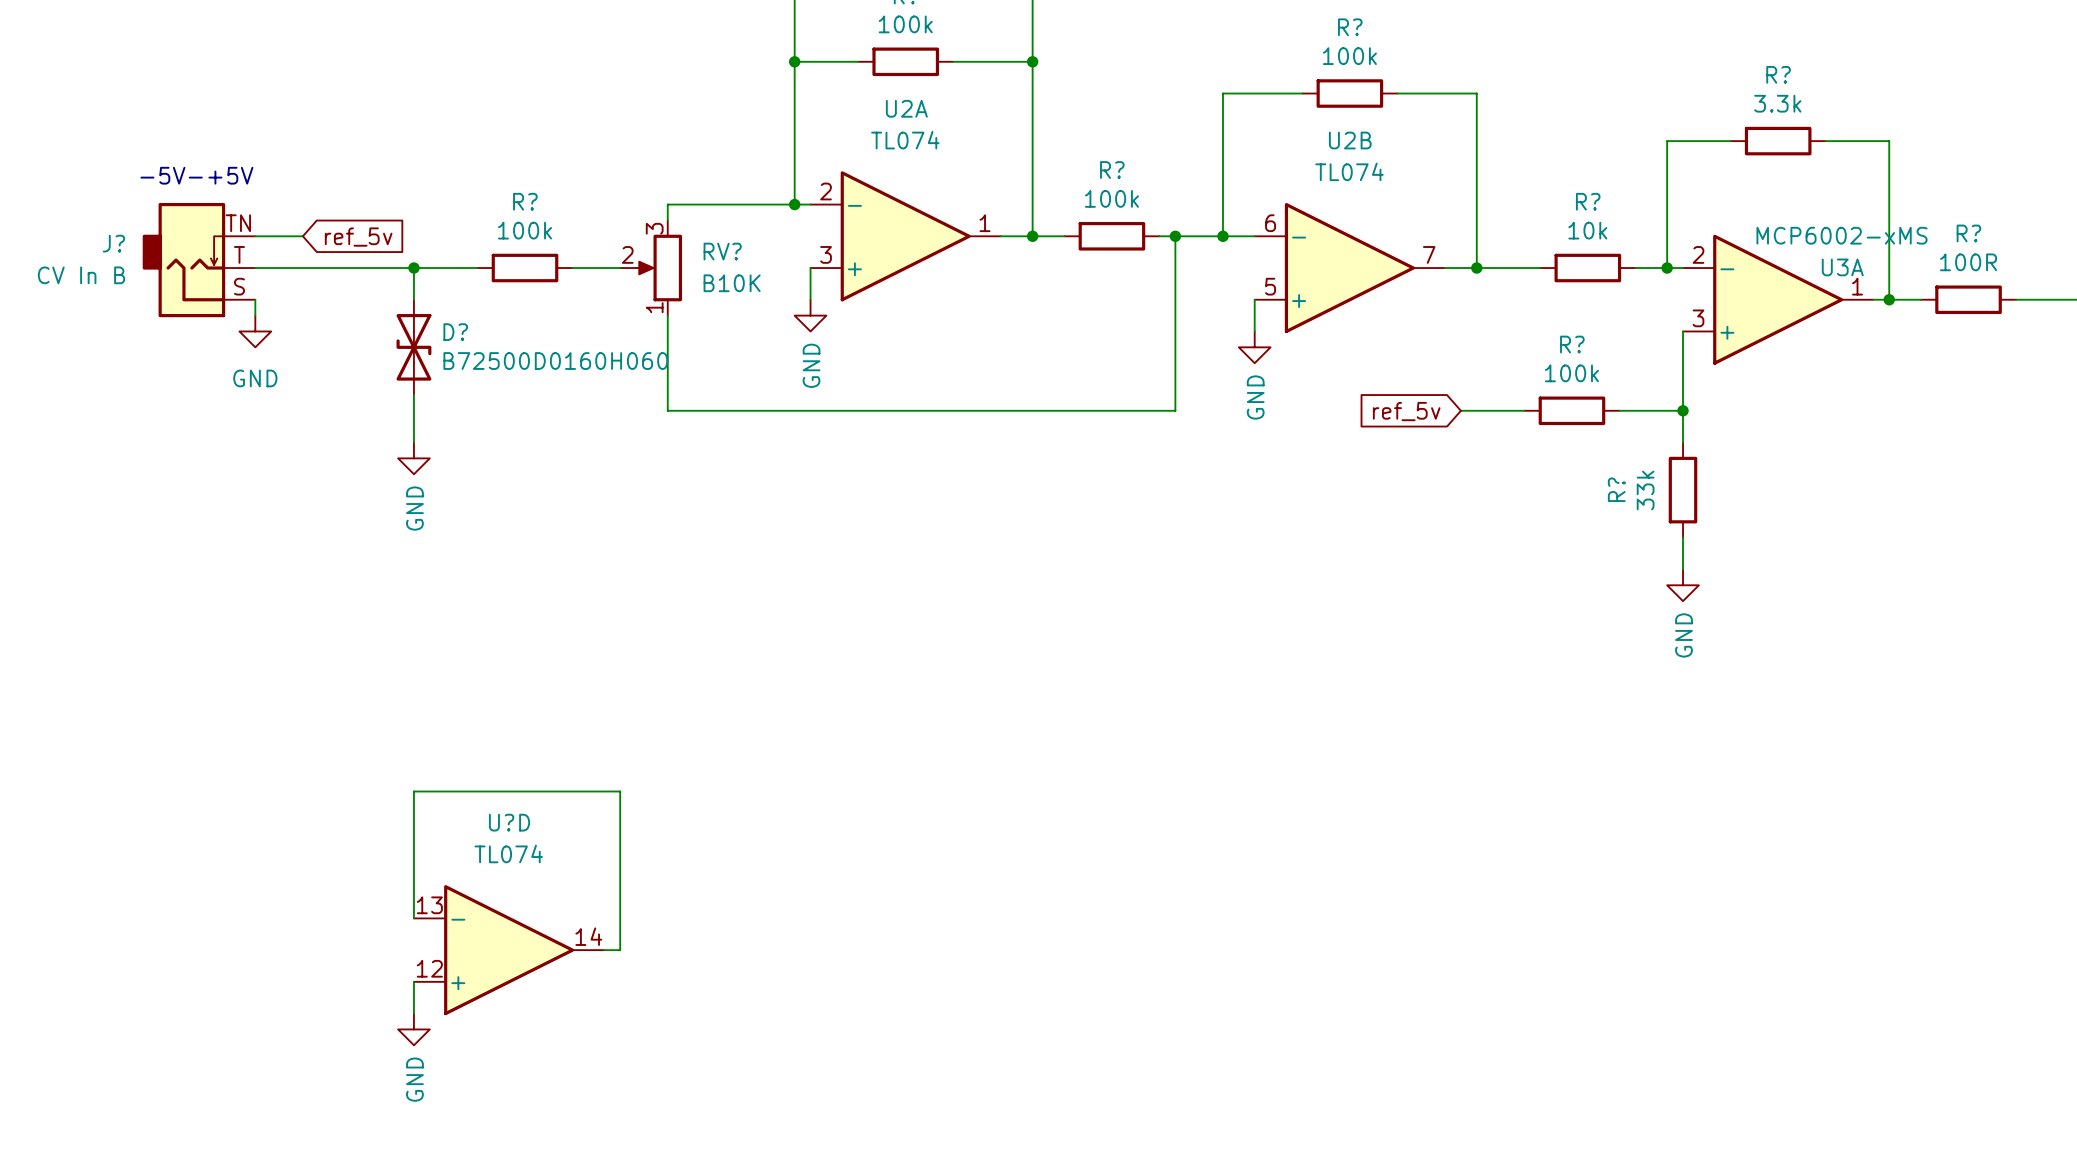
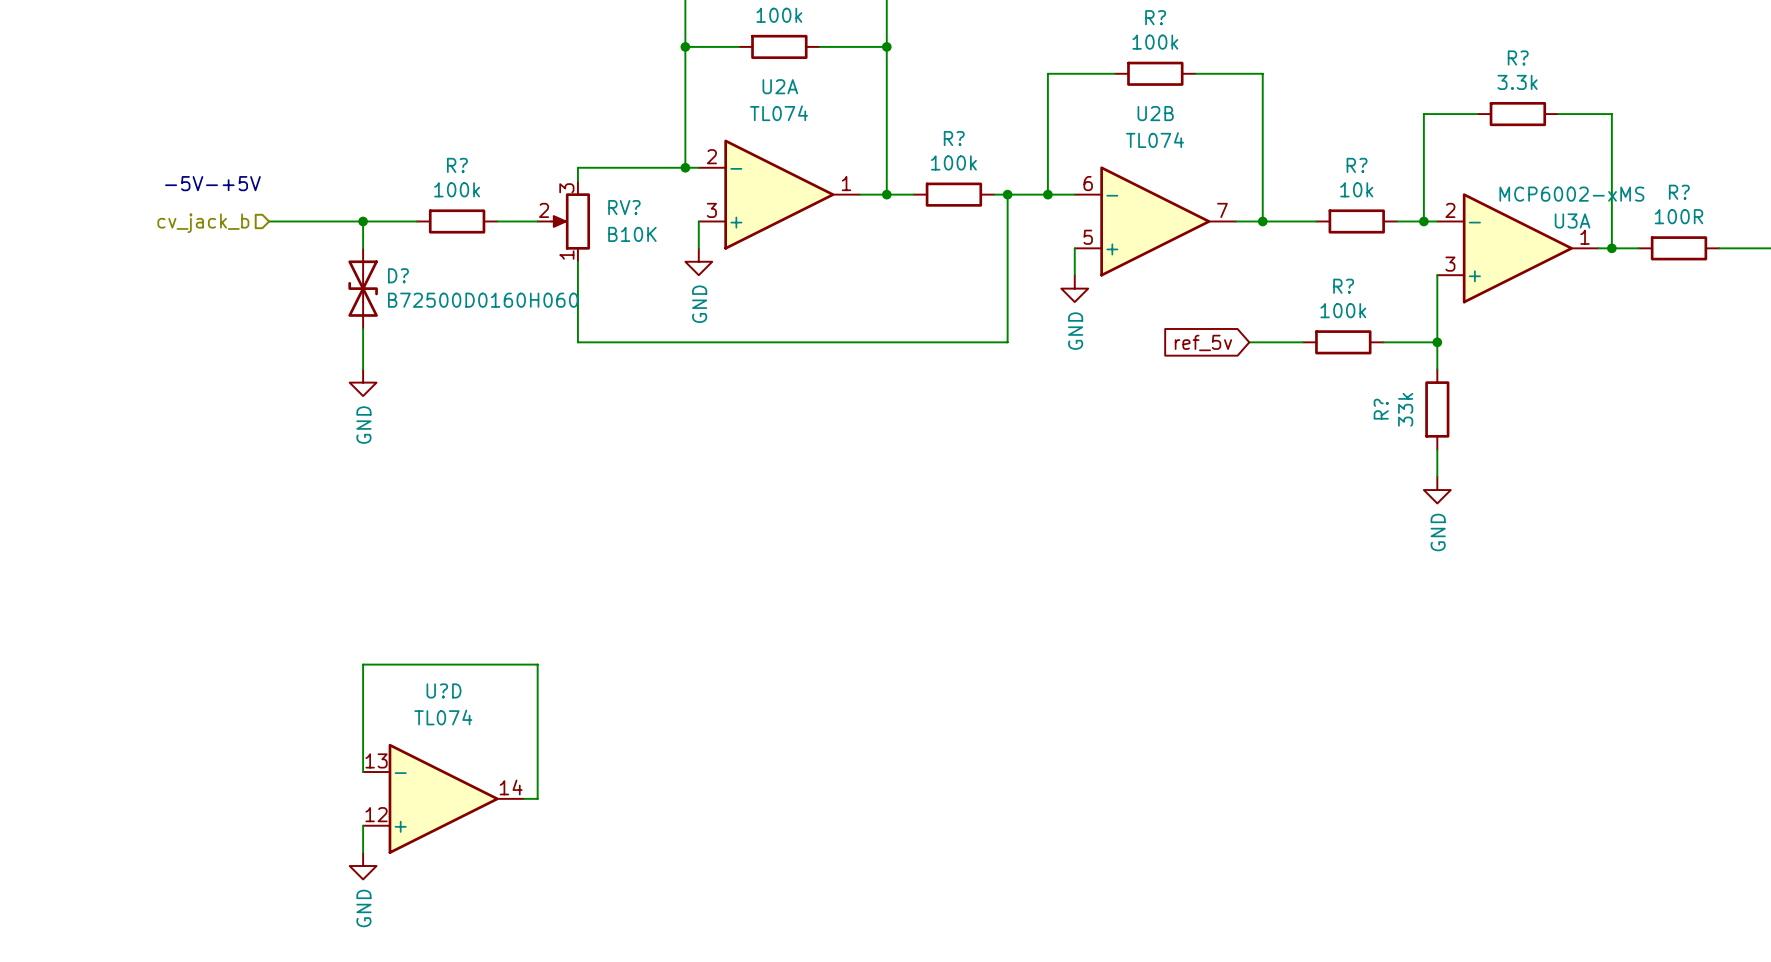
text position: -5V-+5V (196, 175) -> -5V-+5V (212, 183)
wire: (255, 236) (302, 236) -> none
global label: ref_5v (358, 237) -> none
J?: CV In B (199, 260) -> none
wire: (255, 268) (302, 268) -> none
hierarchical label: none -> cv_jack_b (203, 223)
wire: (255, 299) (255, 315) -> none
power symbol: GND (255, 331) -> none

